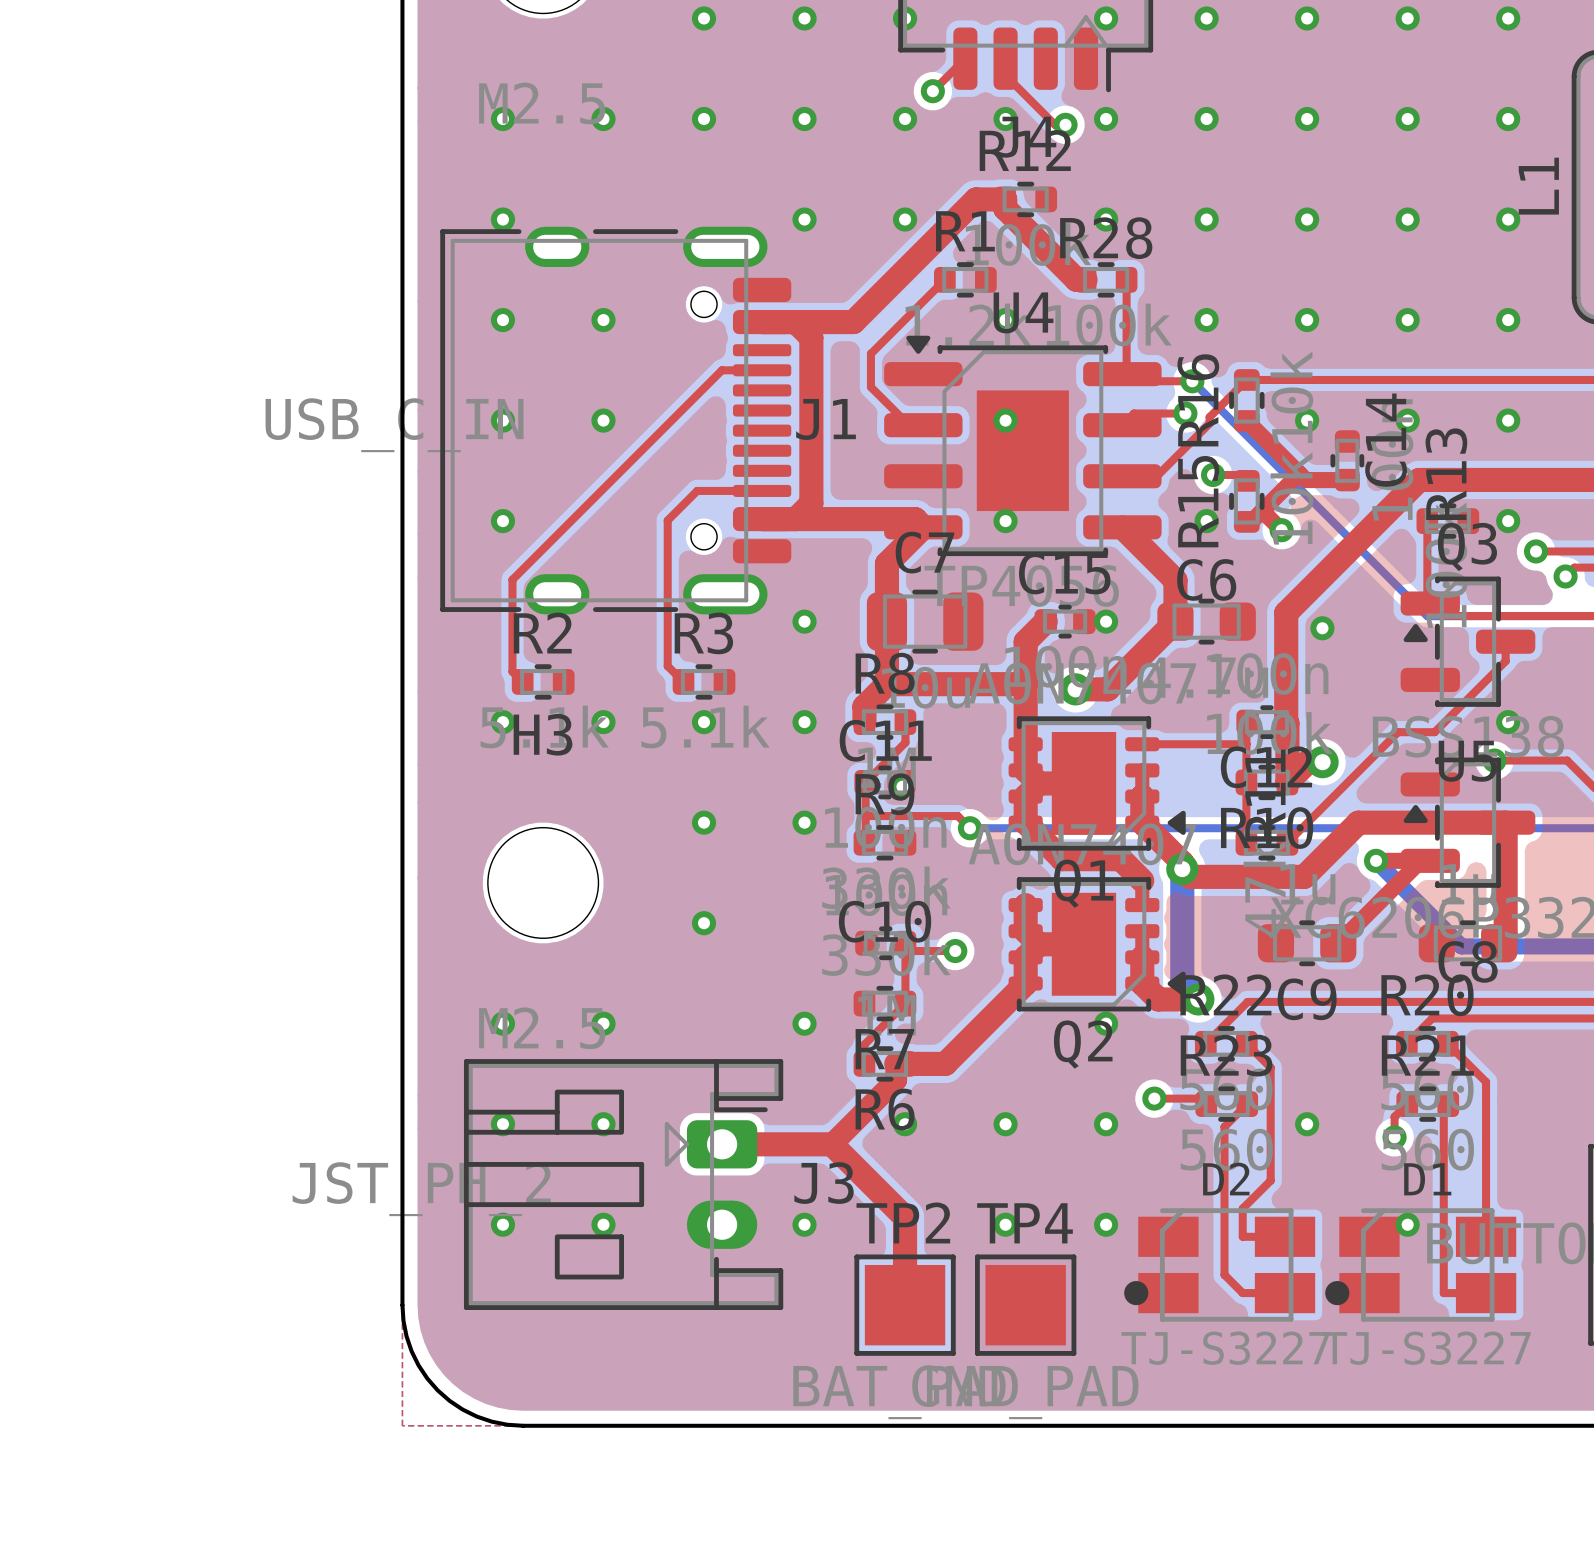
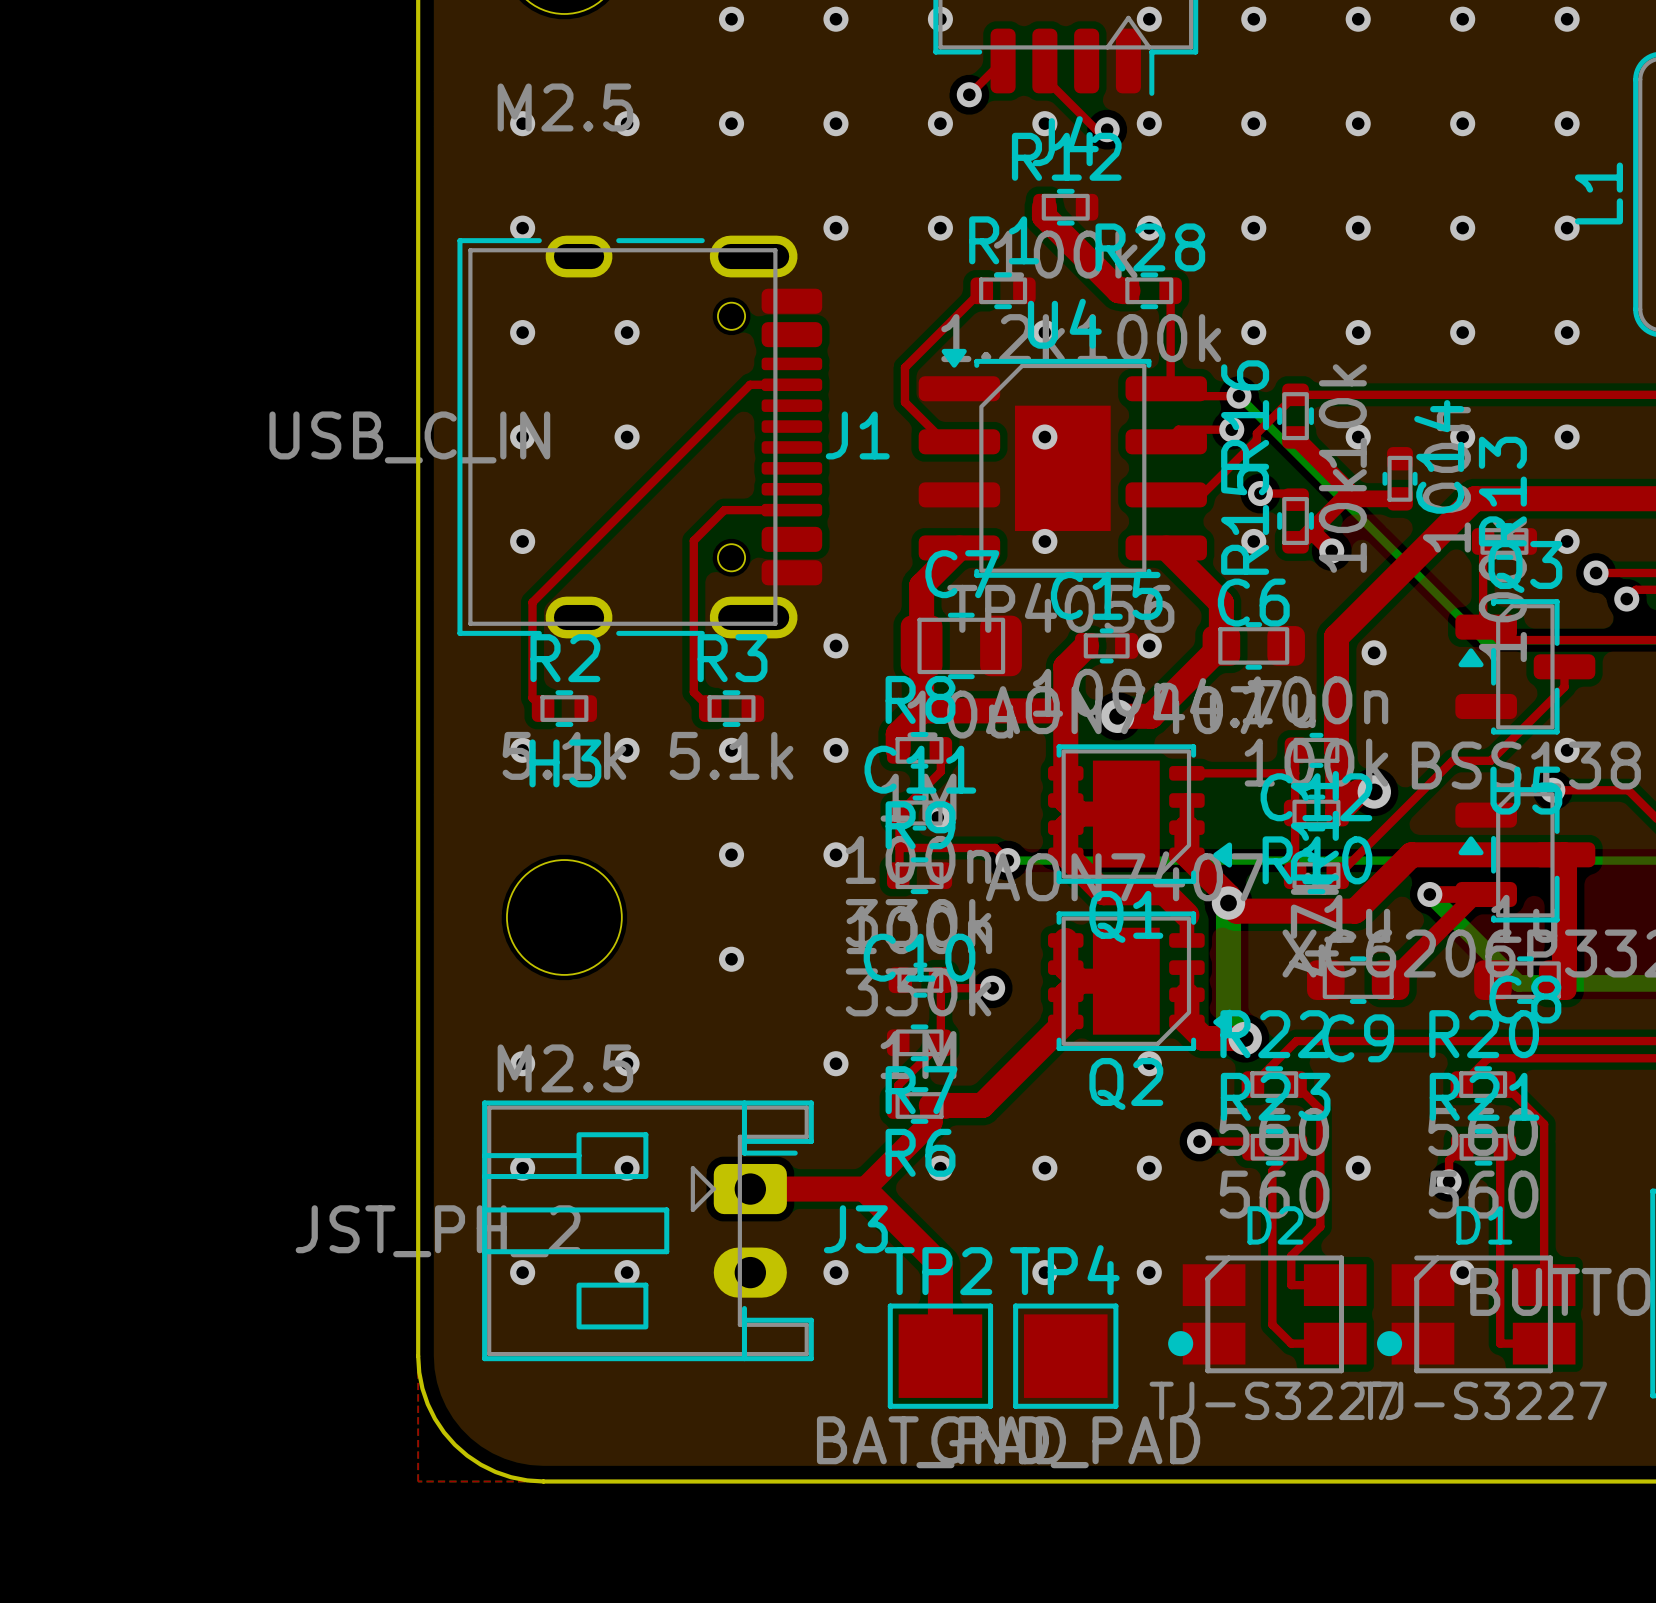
top track: (1005, 199) (976, 199) (853, 322) (762, 322) -> none
top track: (795, 322) (811, 337) (811, 503) (795, 519) -> none
top track: (762, 519) (915, 519) (923, 527) -> none

